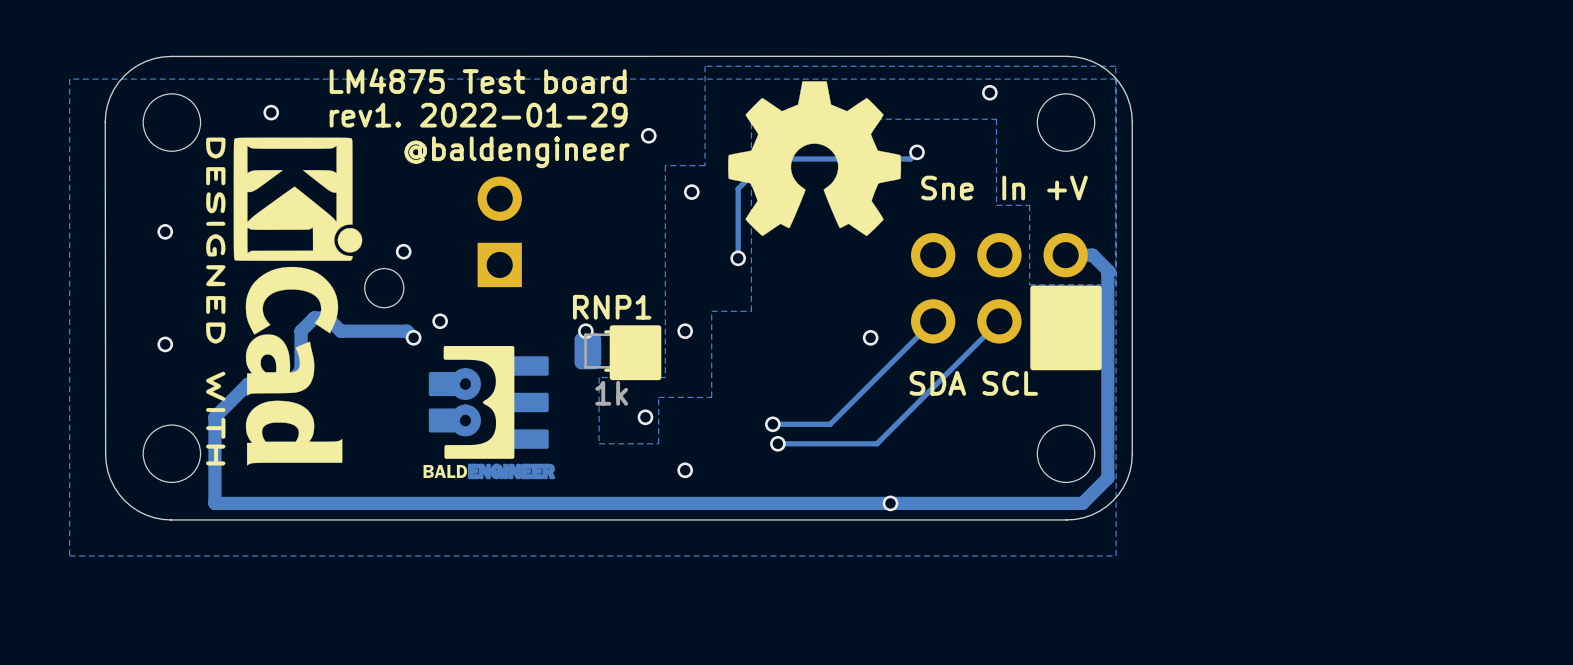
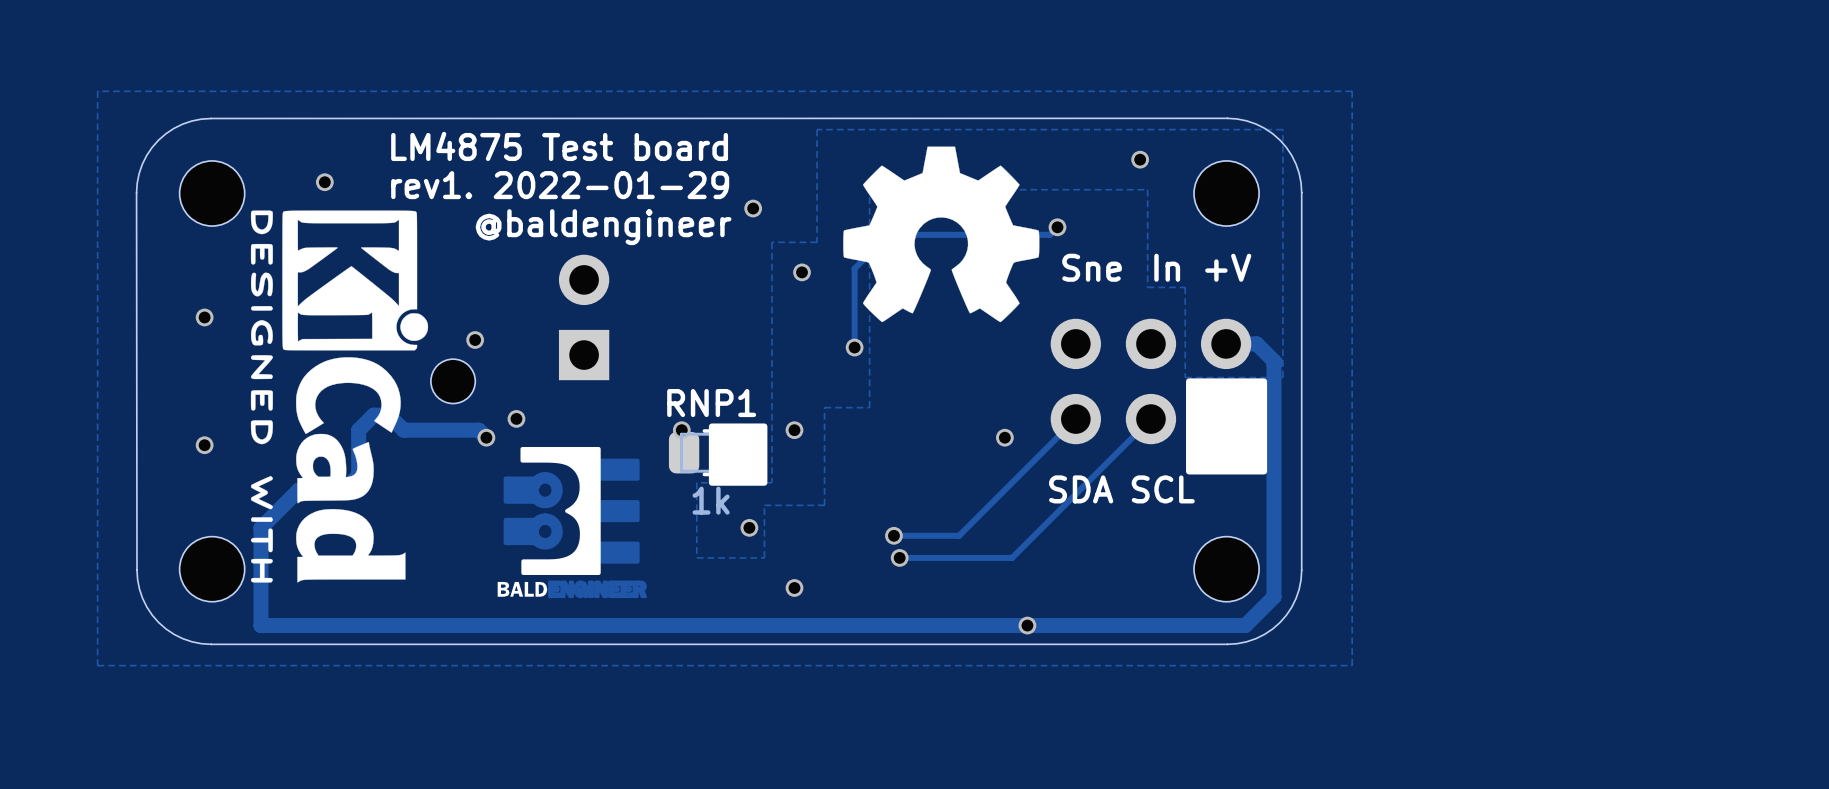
zone outline: (1116, 79) (1116, 555) (69, 555) (69, 79) (1116, 79) -> (1352, 91) (1352, 665) (97, 665) (97, 91) (1352, 91)

